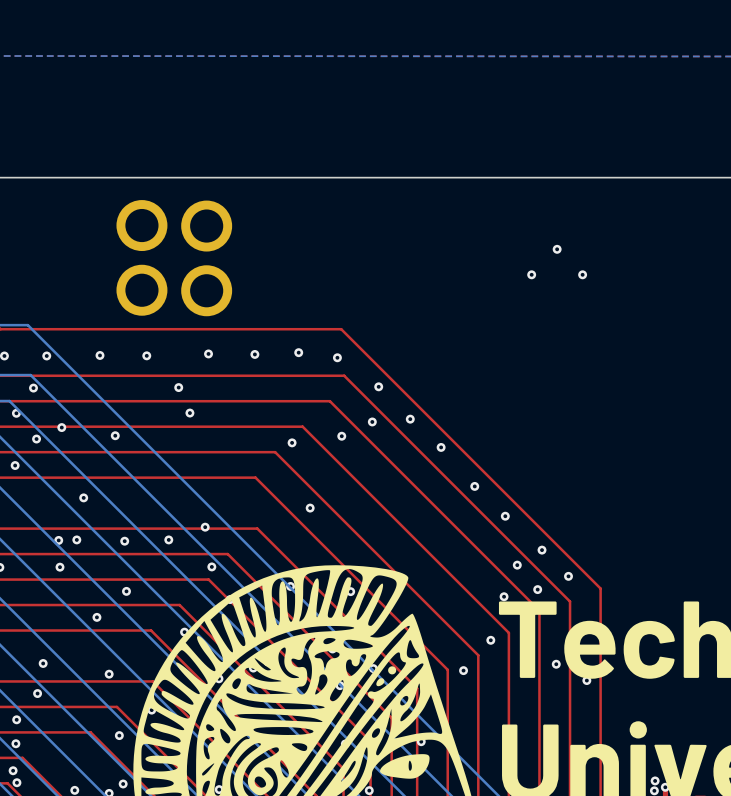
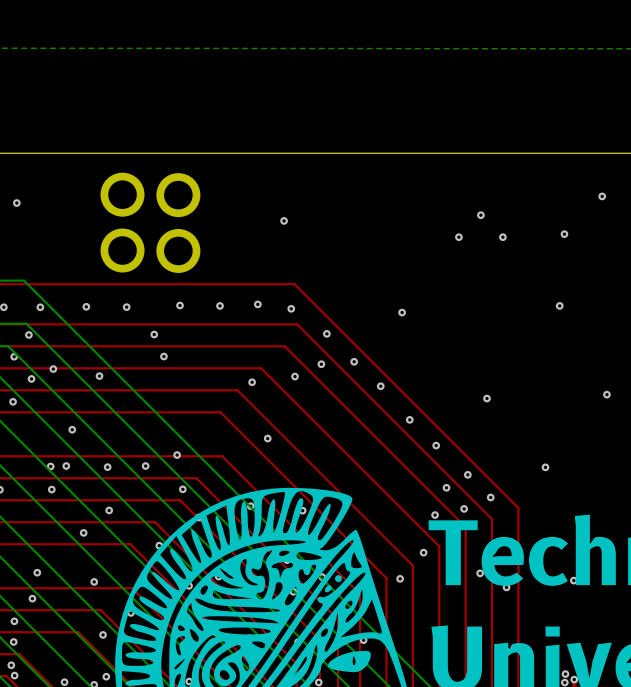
via: none -> (602, 196)
via: none -> (16, 203)
via: none -> (284, 220)
via: none -> (564, 234)
via: none -> (559, 305)
via: none -> (402, 312)
via: none -> (606, 394)
via: none -> (486, 398)
via: none -> (545, 467)
via: none -> (573, 580)

